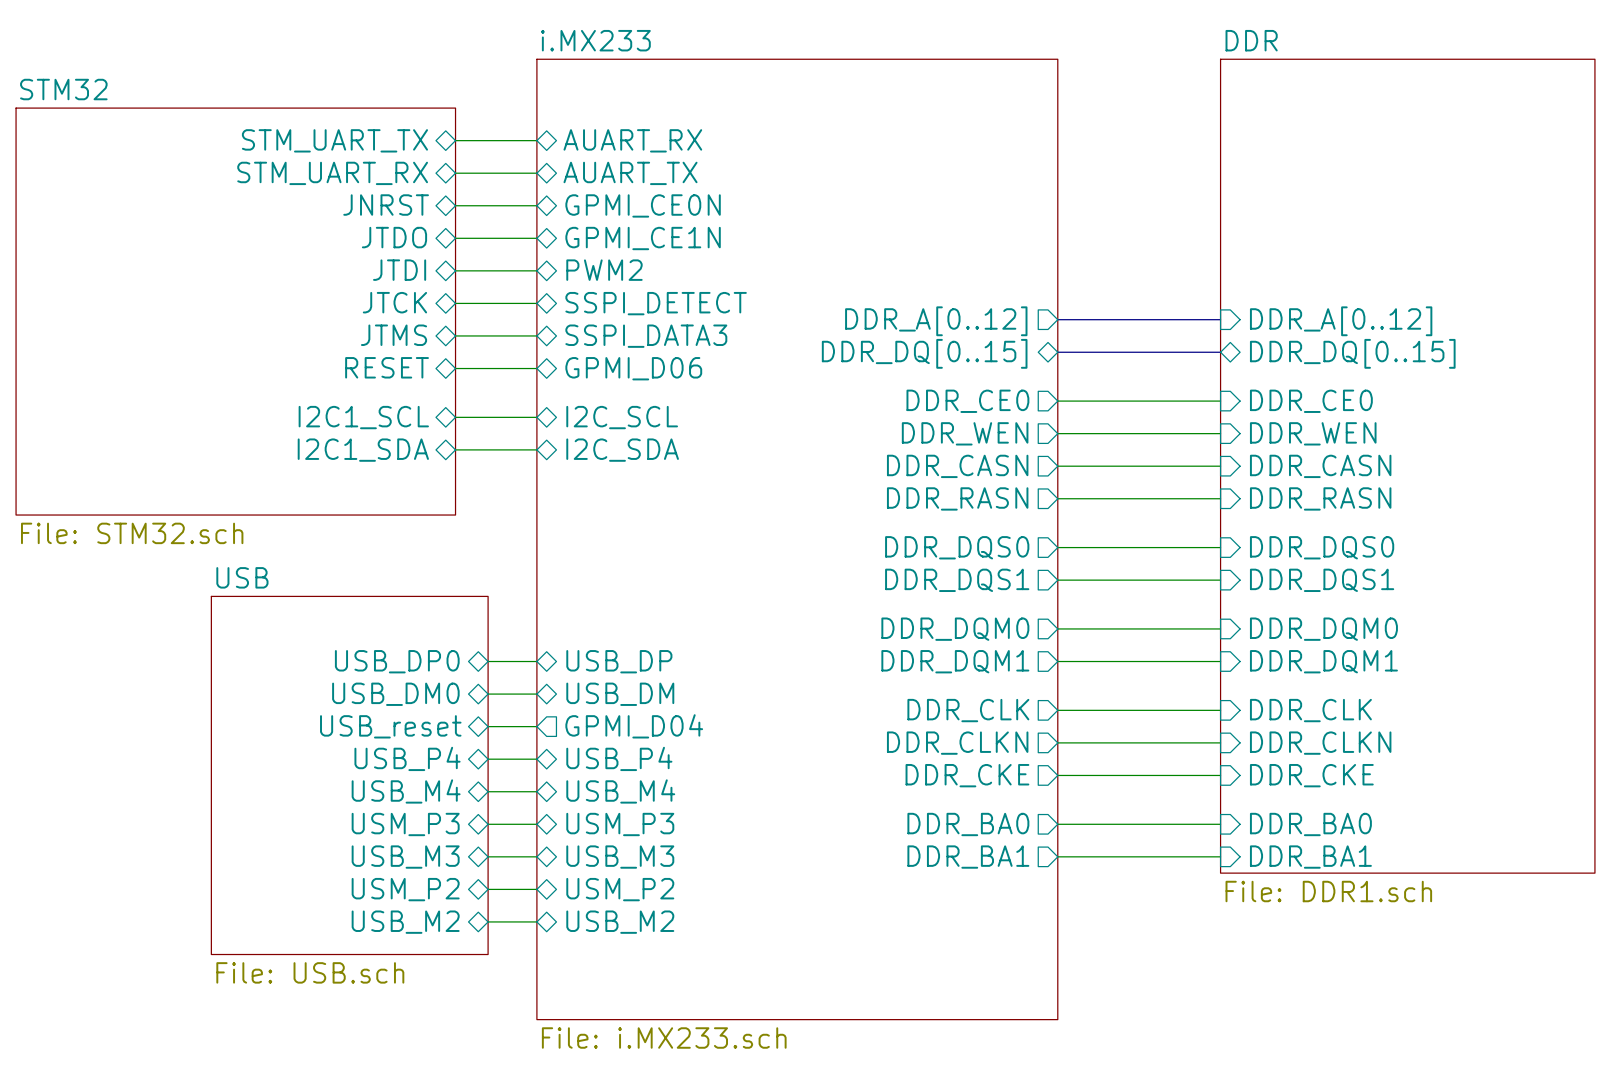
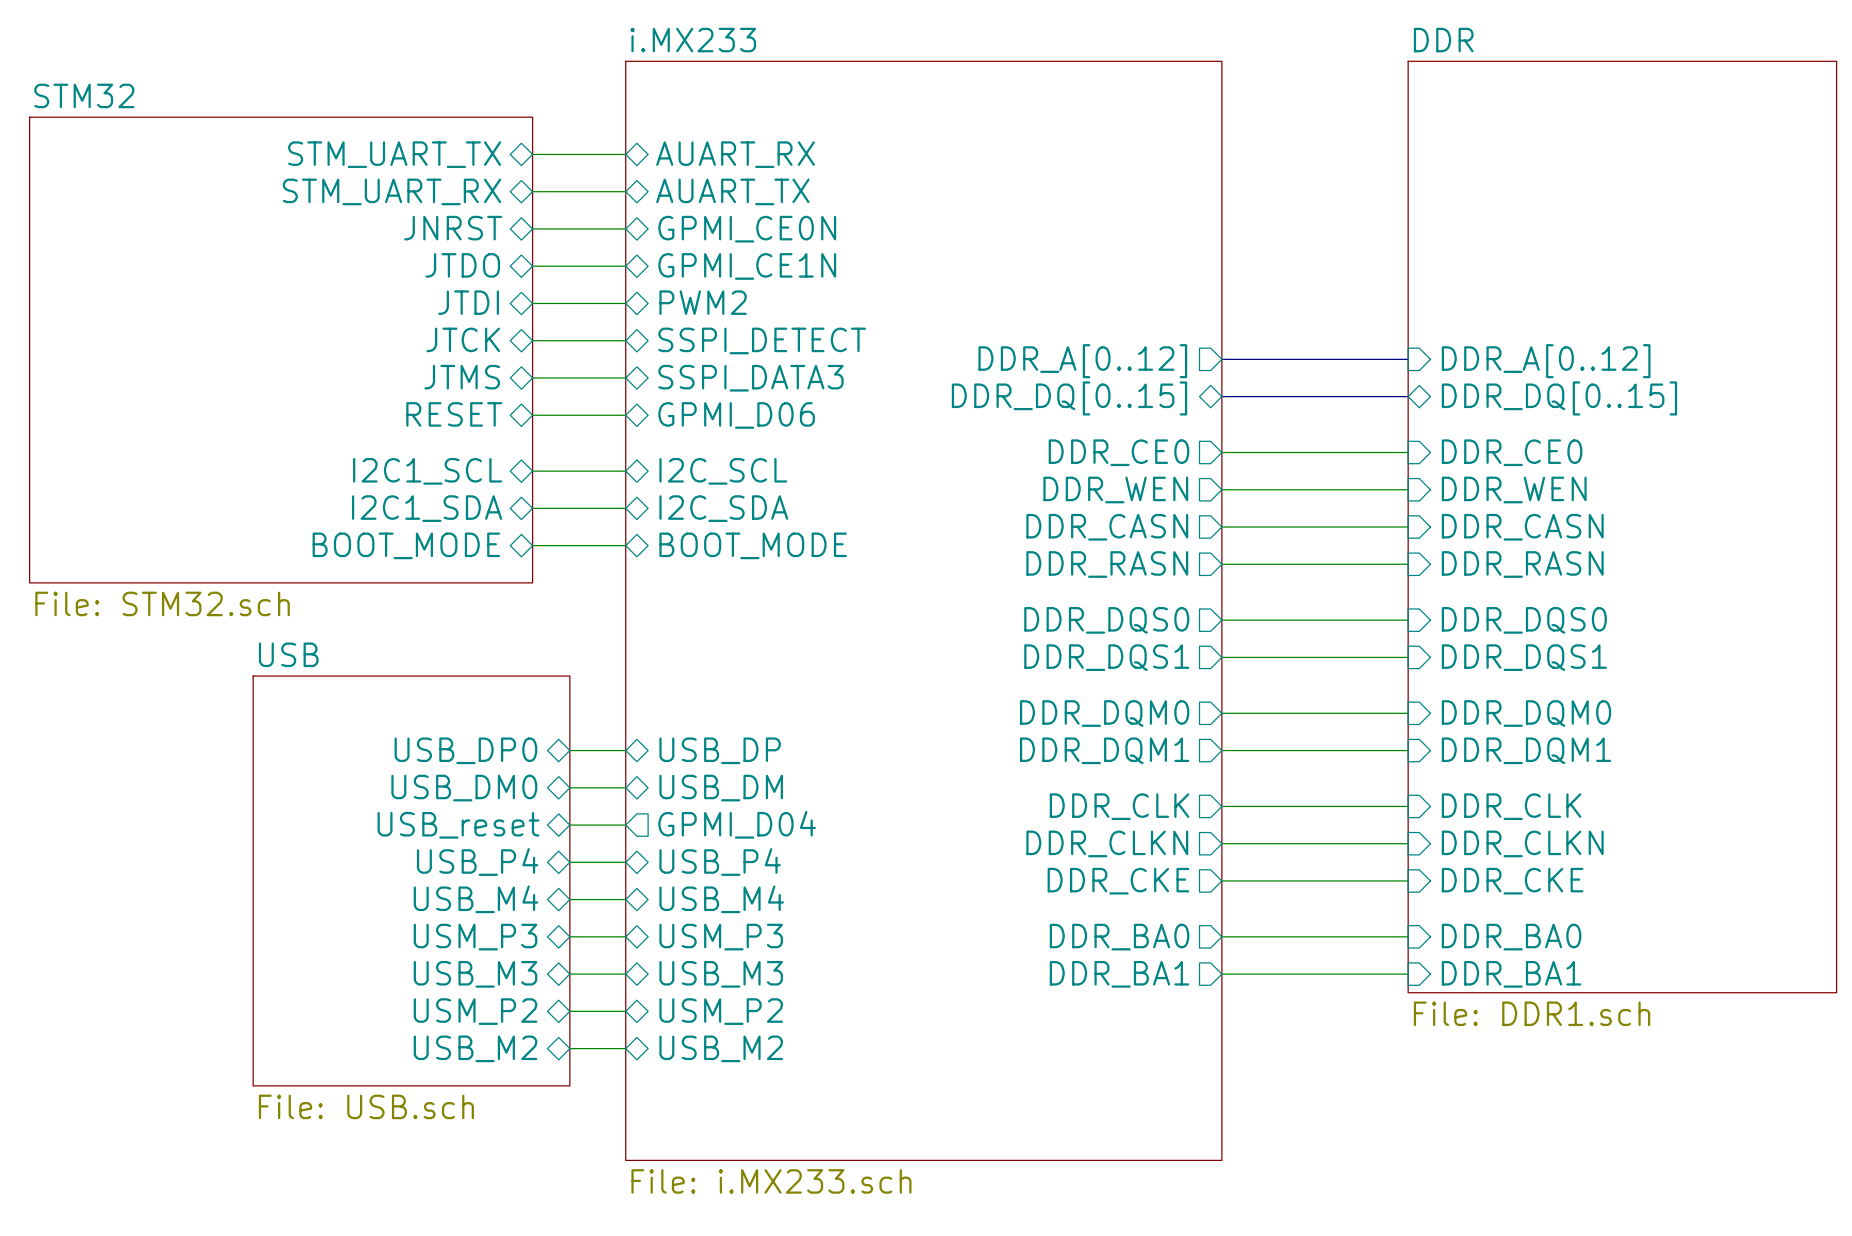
sheet pin: none -> BOOT_MODE (406, 545)
wire: none -> (532, 545) (625, 545)
sheet pin: none -> BOOT_MODE (753, 545)

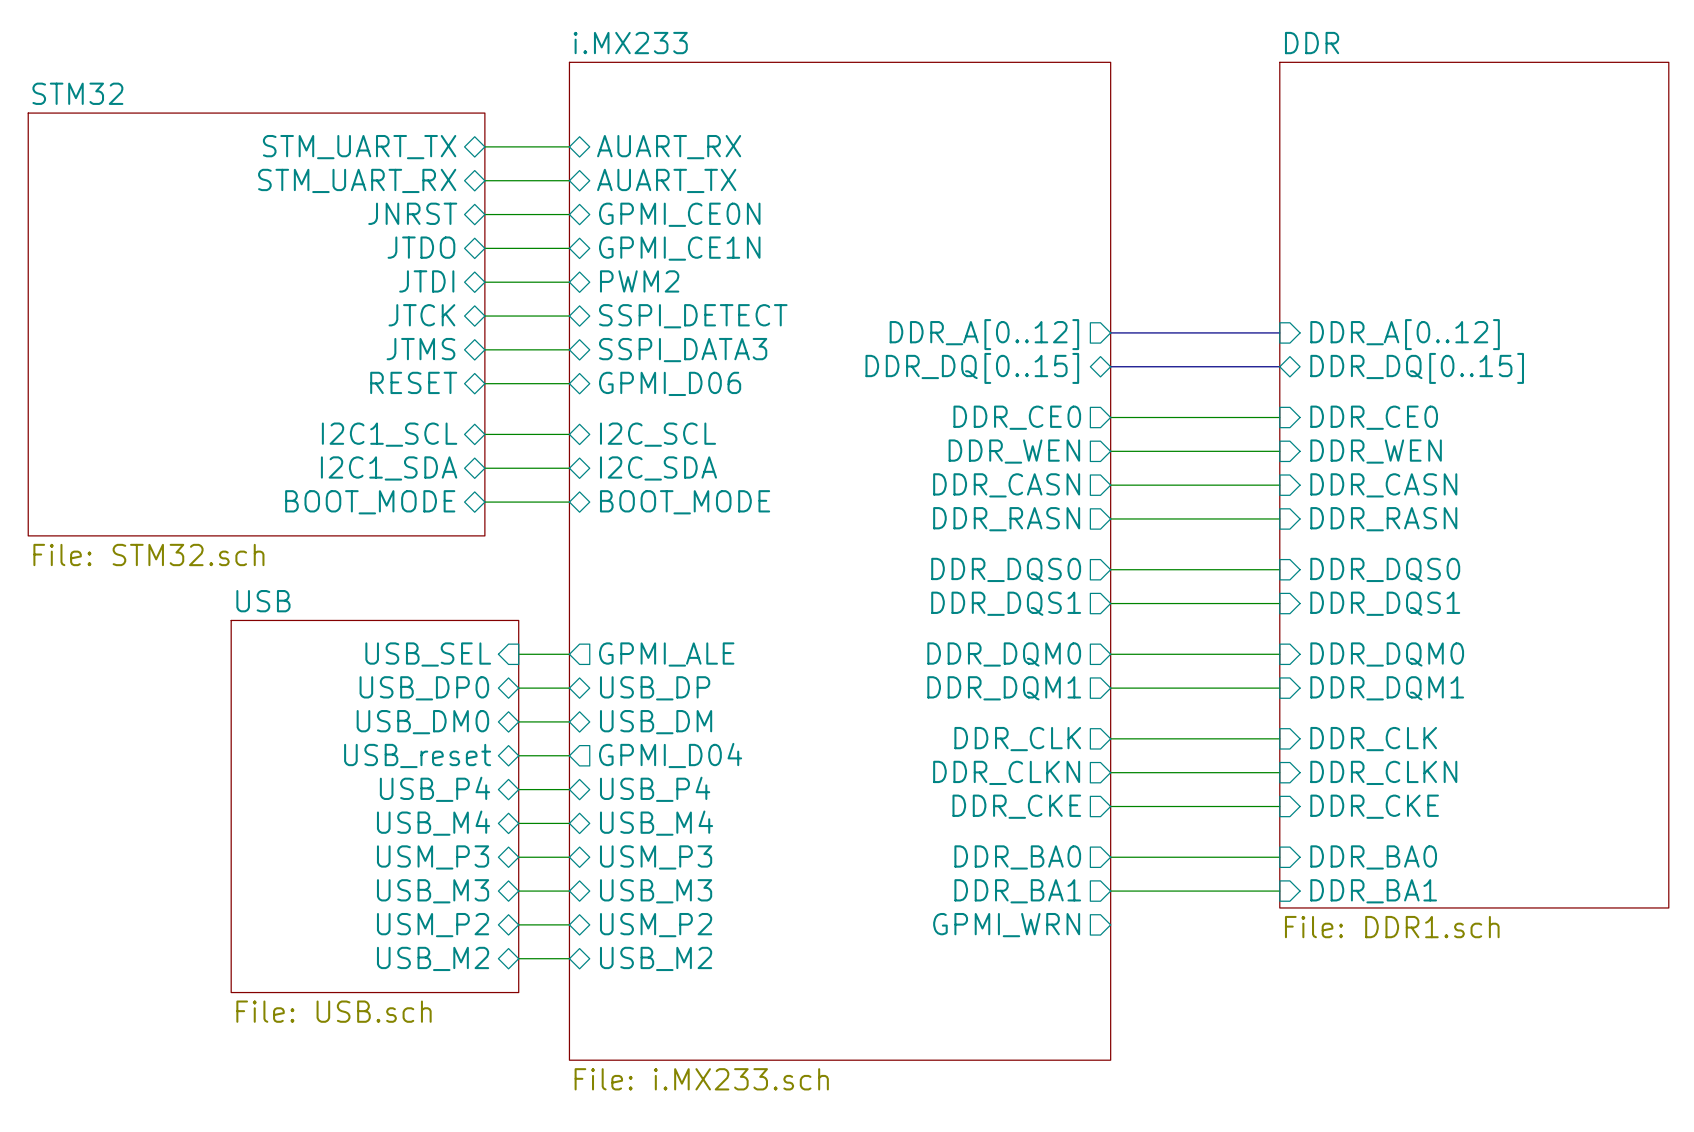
sheet pin: none -> USB_SEL (428, 654)
wire: none -> (518, 654) (569, 654)
sheet pin: none -> GPMI_ALE (666, 654)
sheet pin: none -> GPMI_WRN (1006, 925)

